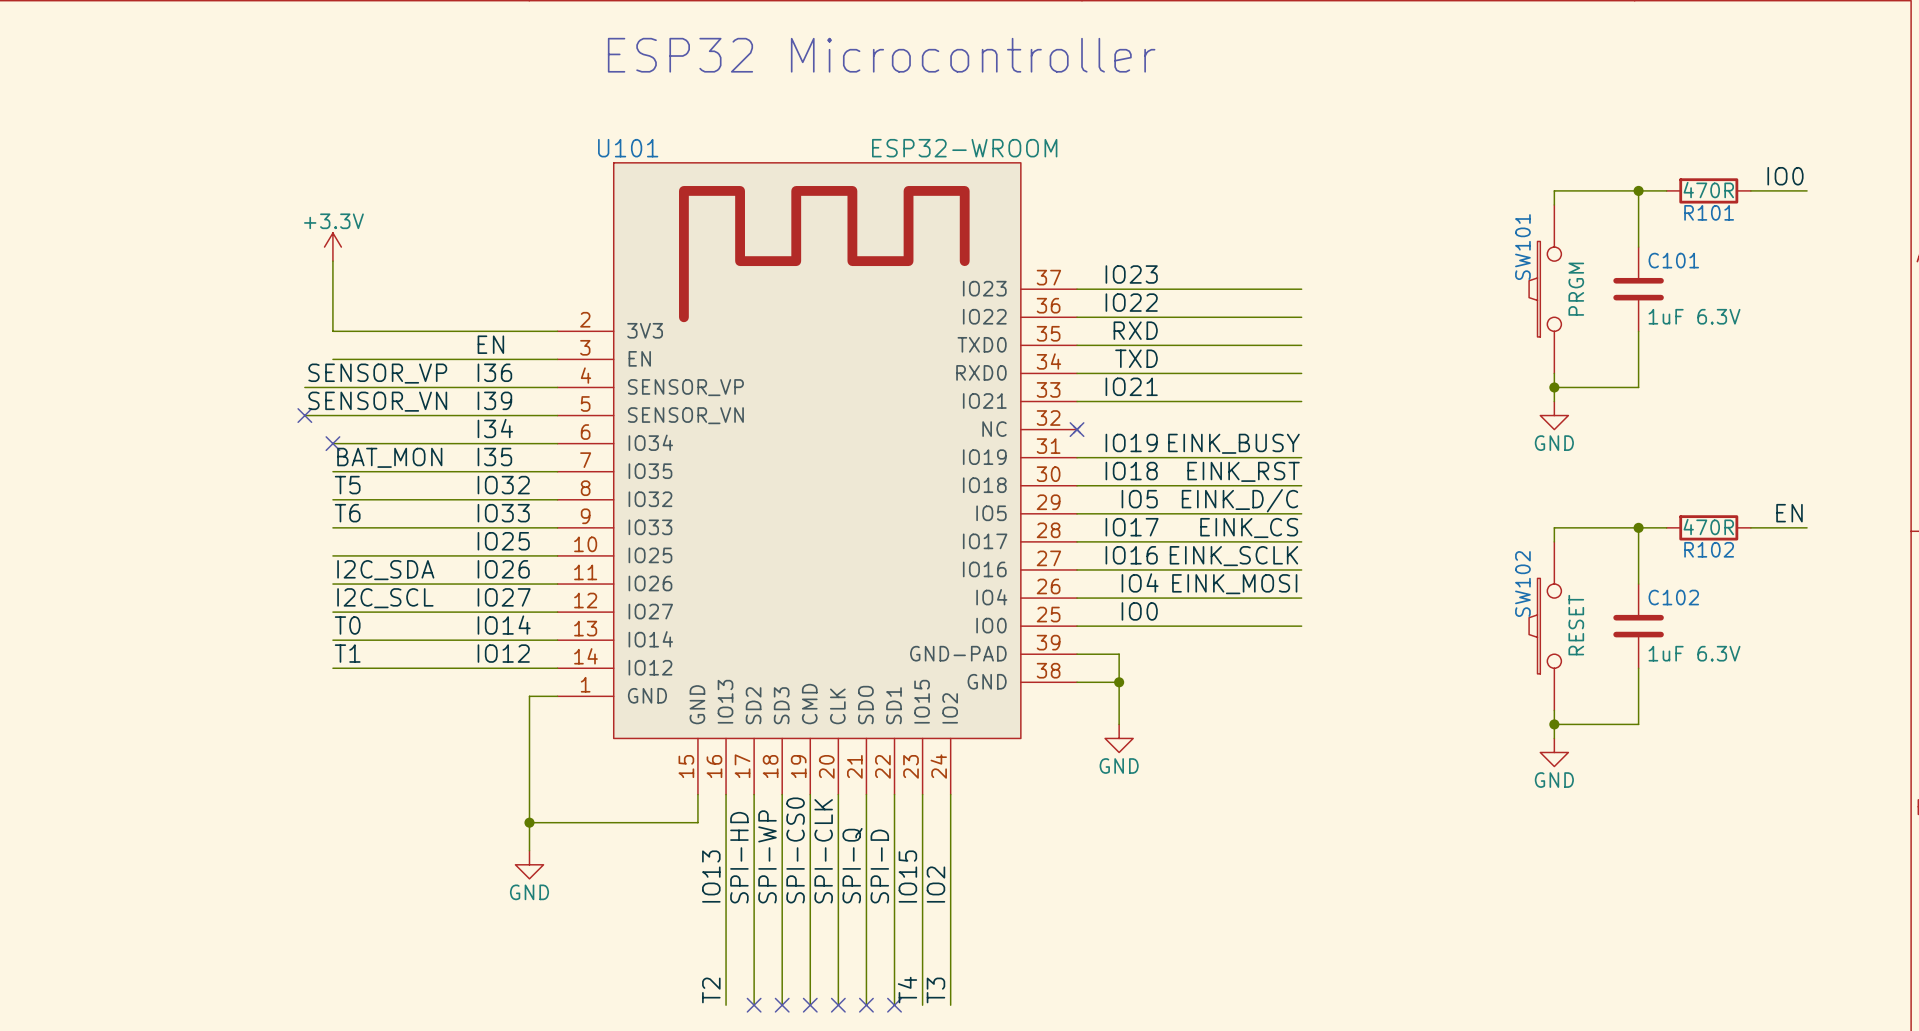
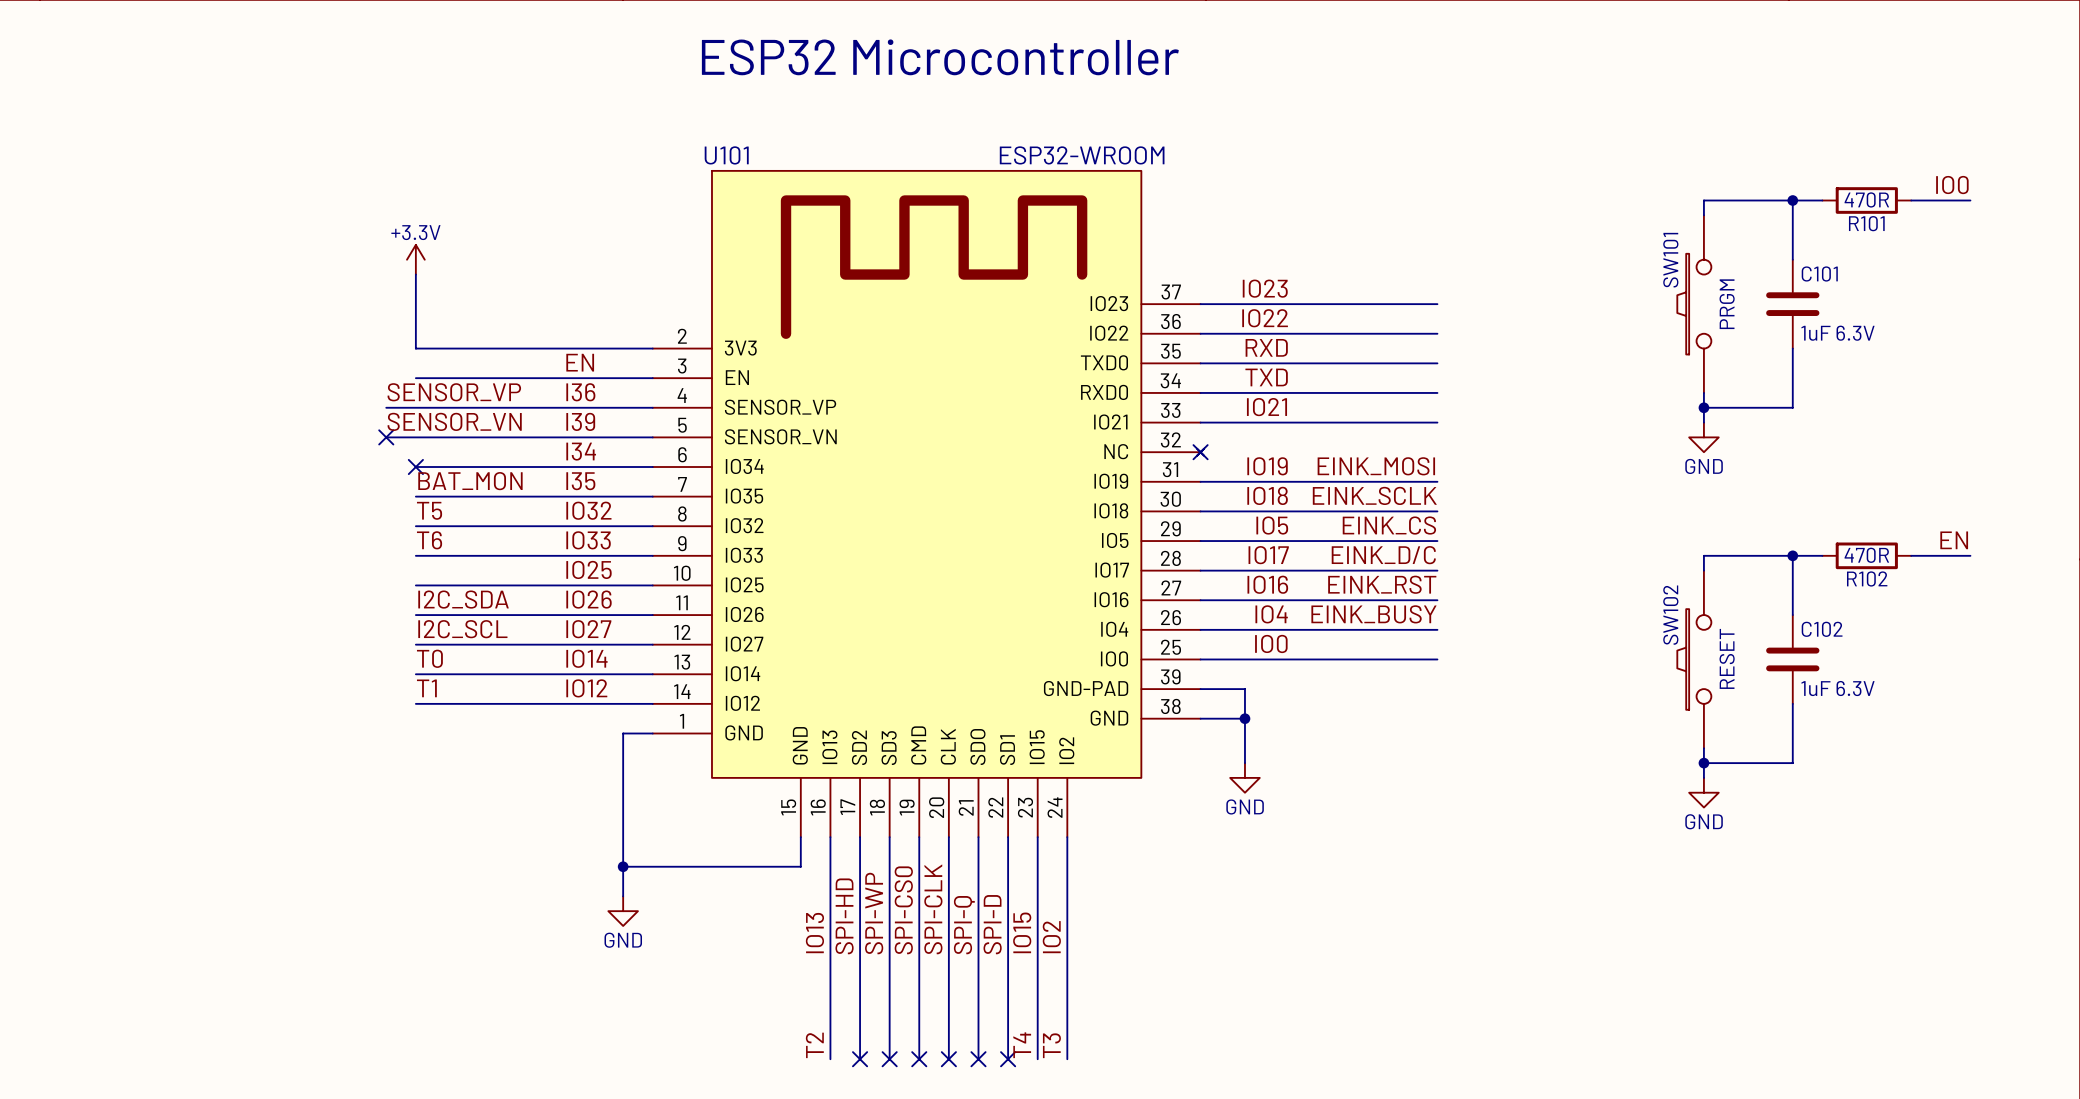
label: EINK_BUSY (1233, 443) -> EINK_MOSI (1376, 466)
label: EINK_RST (1243, 471) -> EINK_SCLK (1374, 495)
label: EINK_D/C (1239, 500) -> EINK_CS (1389, 525)
label: EINK_CS (1249, 528) -> EINK_D/C (1383, 555)
label: EINK_SCLK (1233, 556) -> EINK_RST (1382, 584)
label: EINK_MOSI (1234, 584) -> EINK_BUSY (1373, 614)

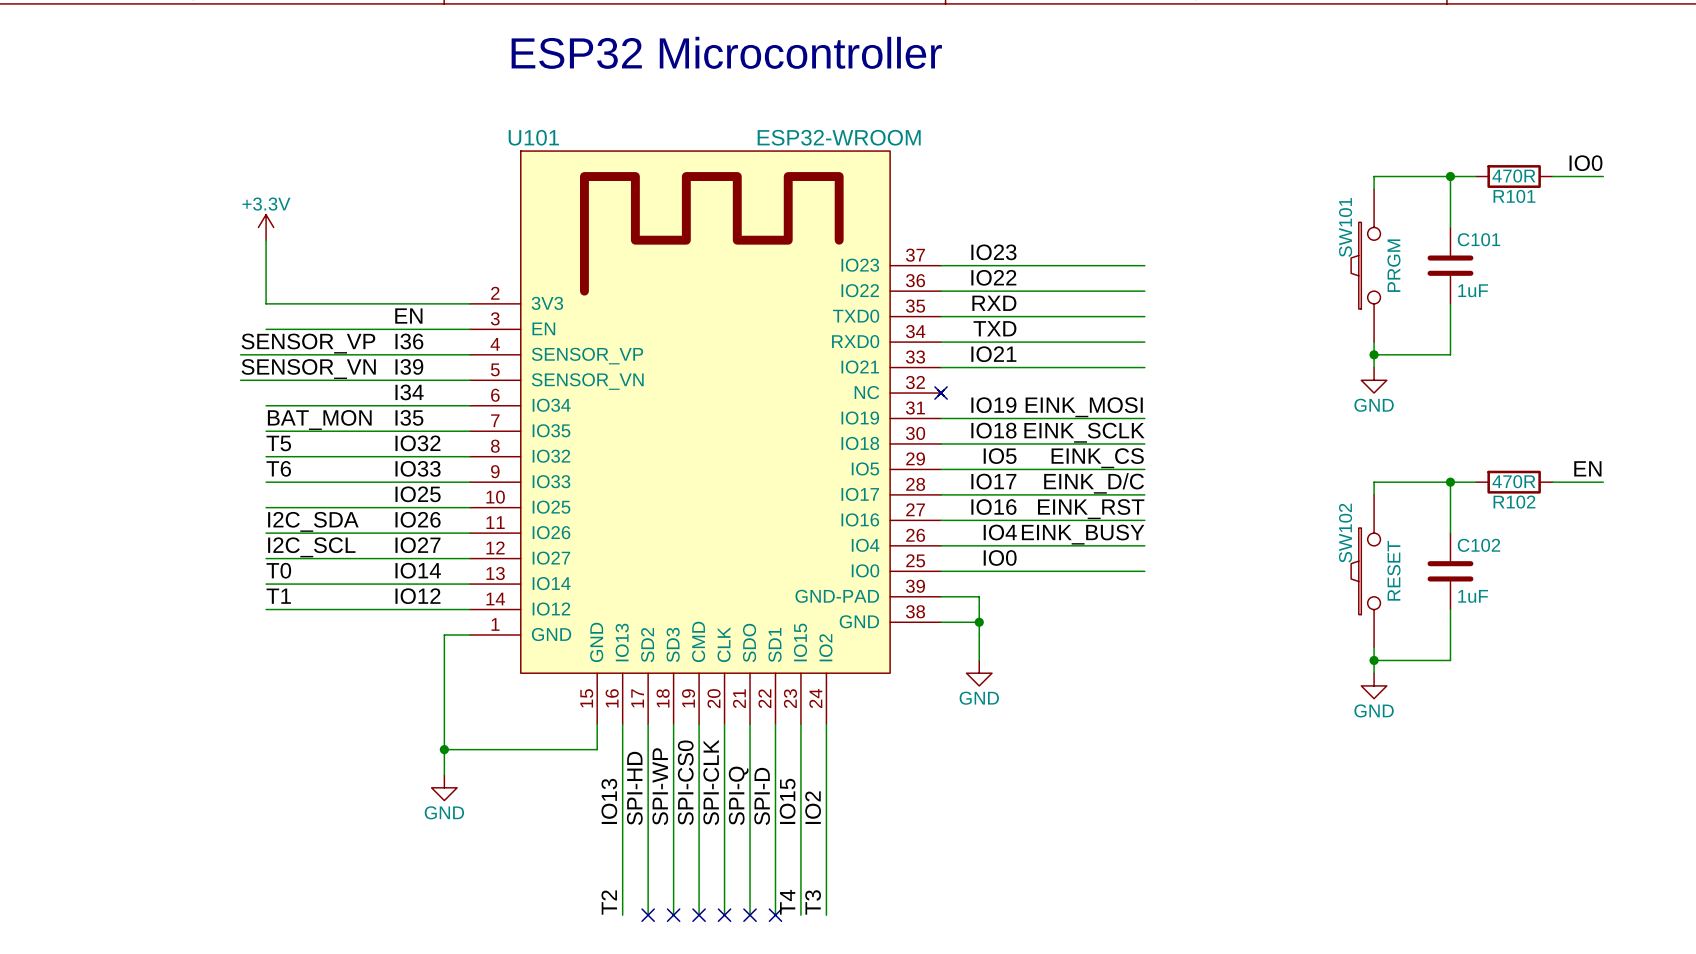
C101 value: 1uF 6.3V (1838, 333) -> 1uF (1473, 290)
no-connect mark: (386, 437) -> none
no-connect mark: (415, 467) -> none
C102 value: 1uF 6.3V (1838, 688) -> 1uF (1473, 596)

